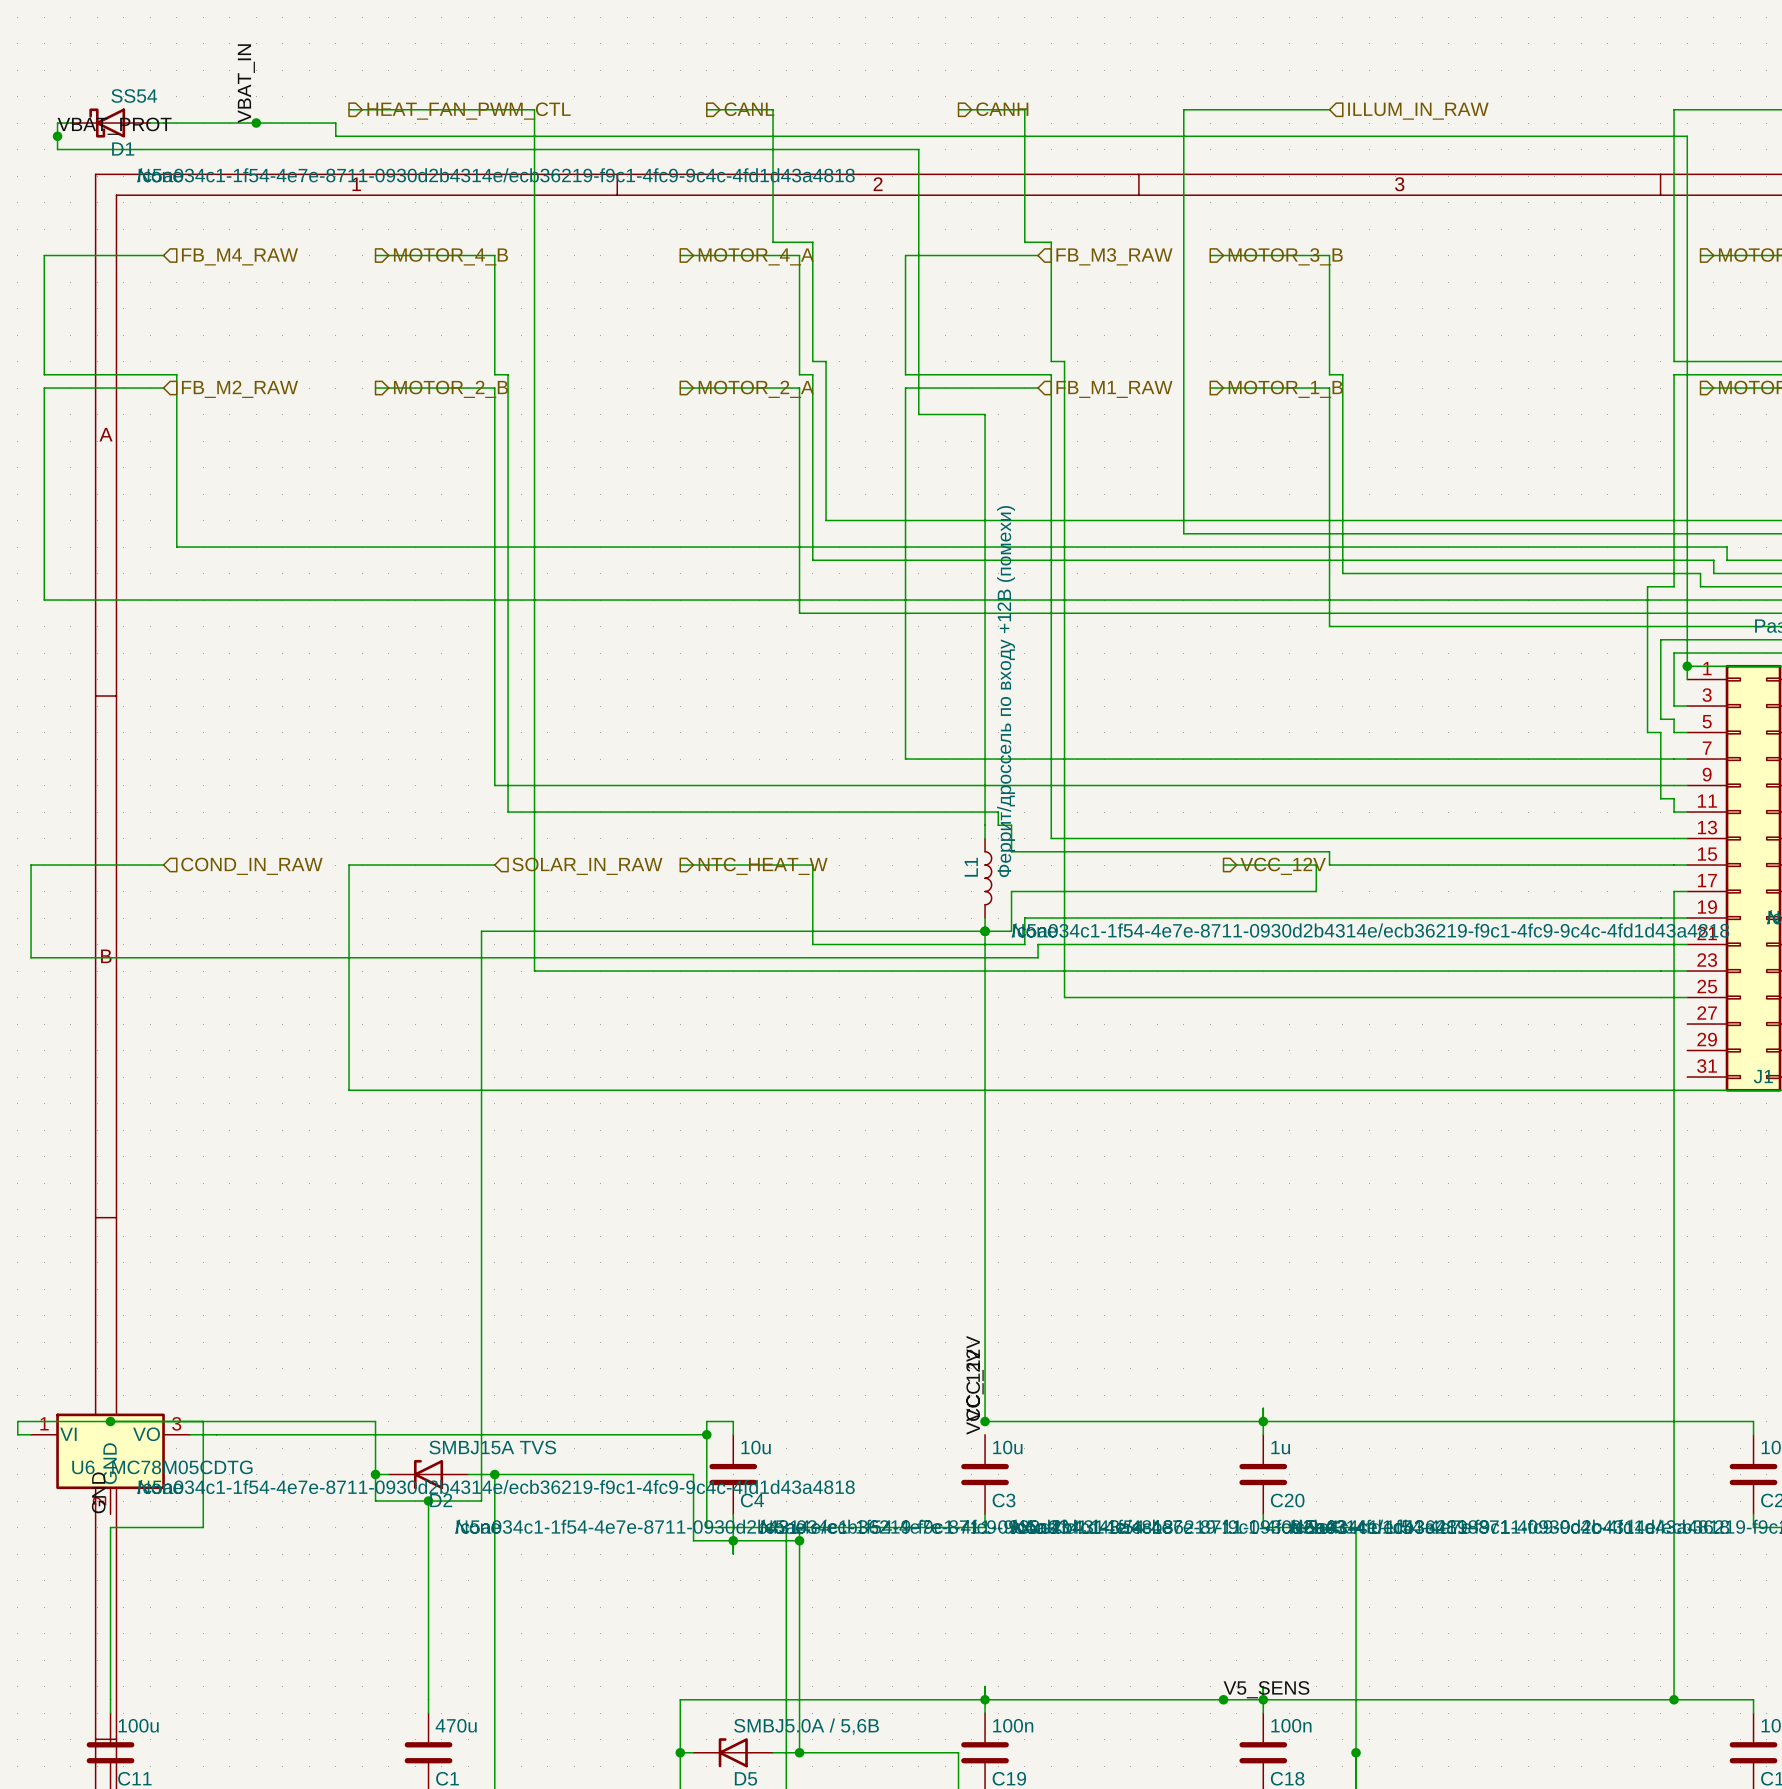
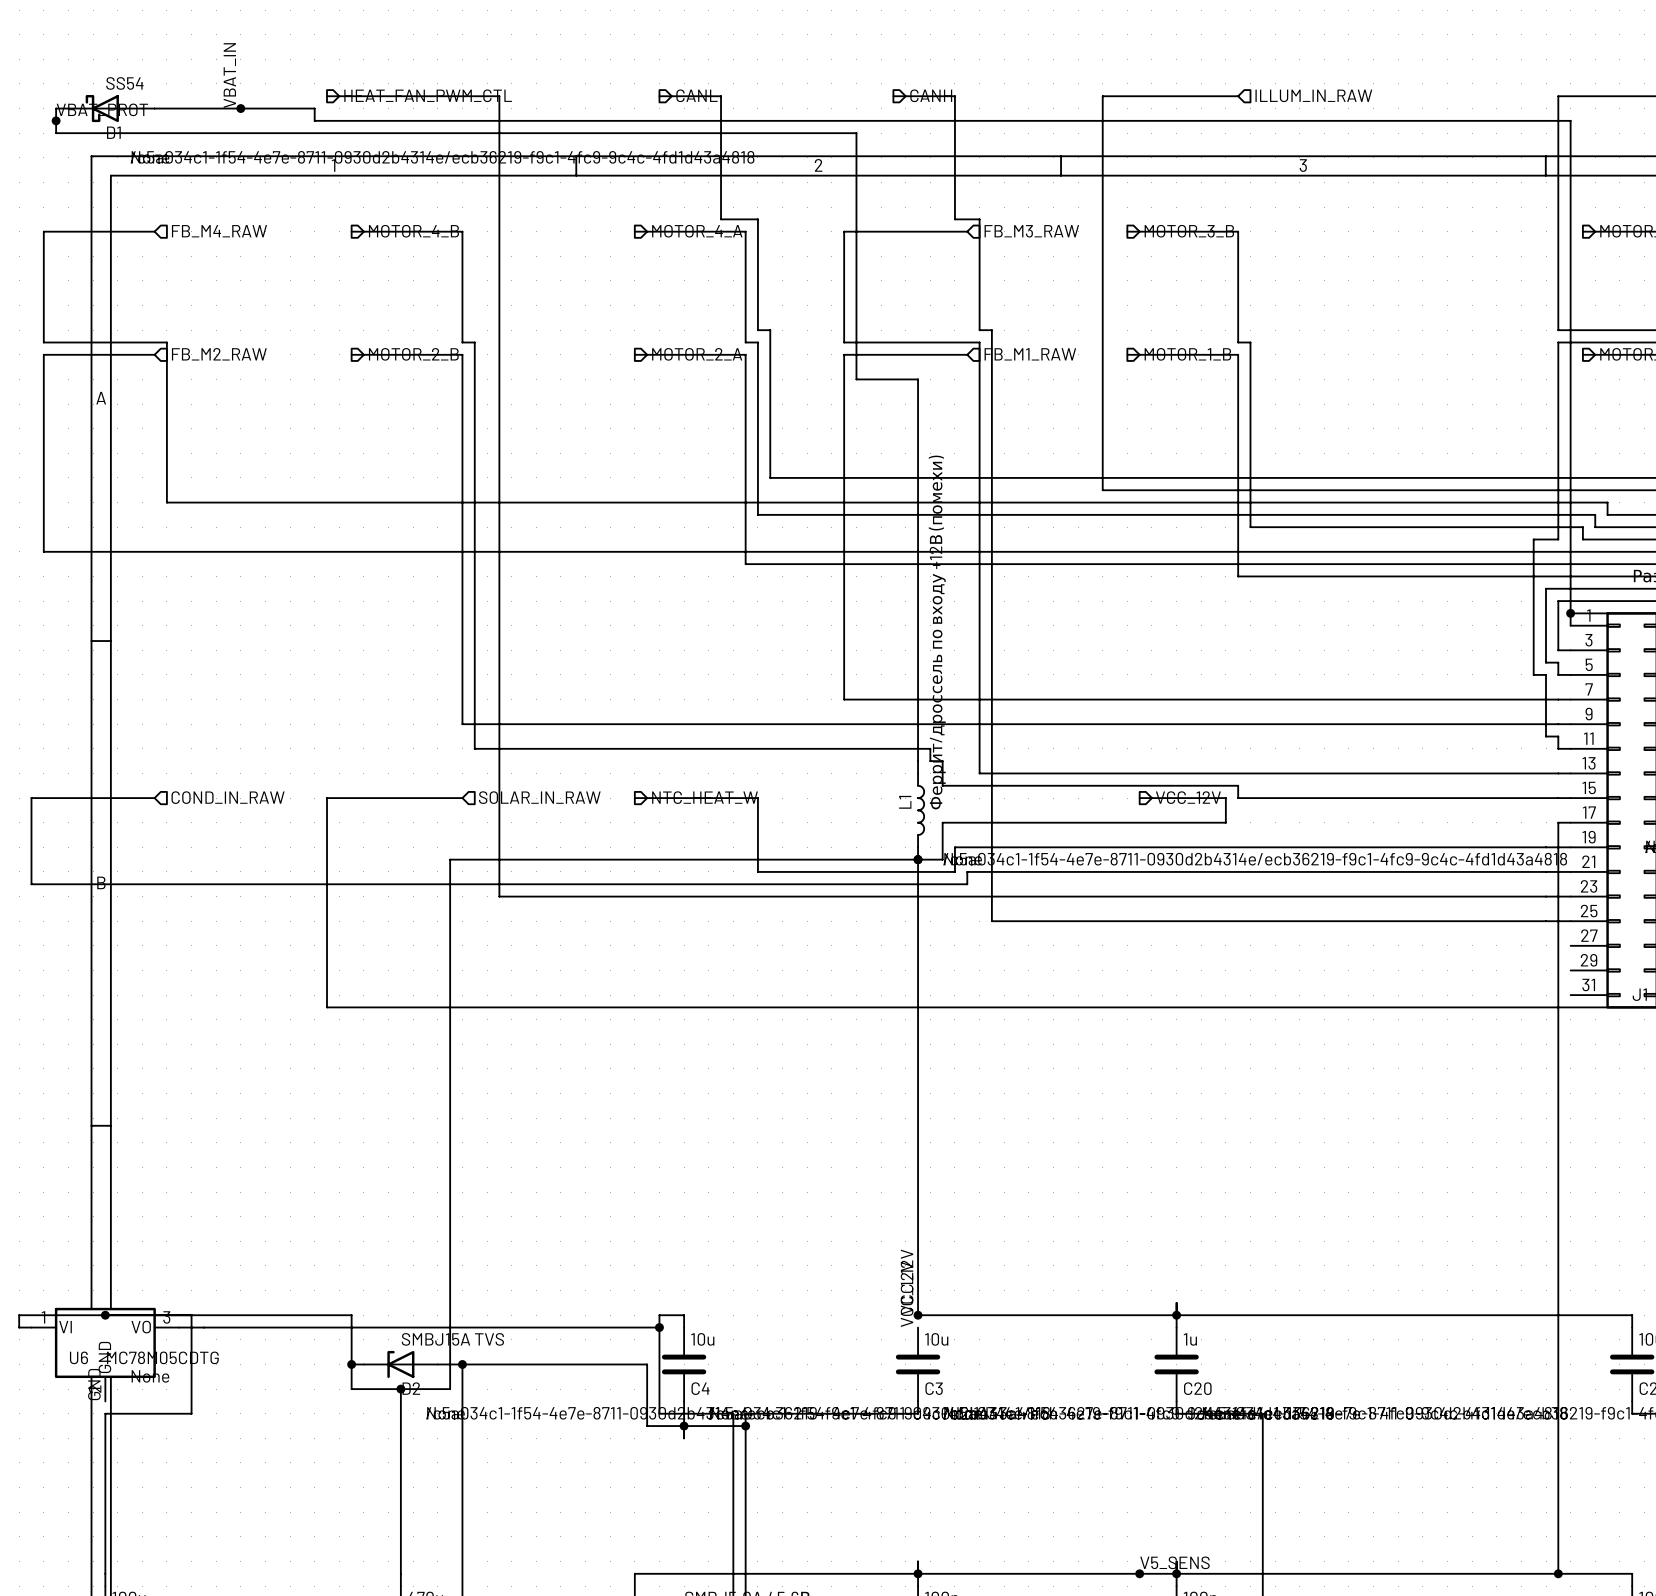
U6 text: /c5a034c1-1f54-4e7e-8711-0930d2b4314e/ecb36219-f9c1-4fc9-9c4c-4fd1d43a4818 (495, 1487) -> none

